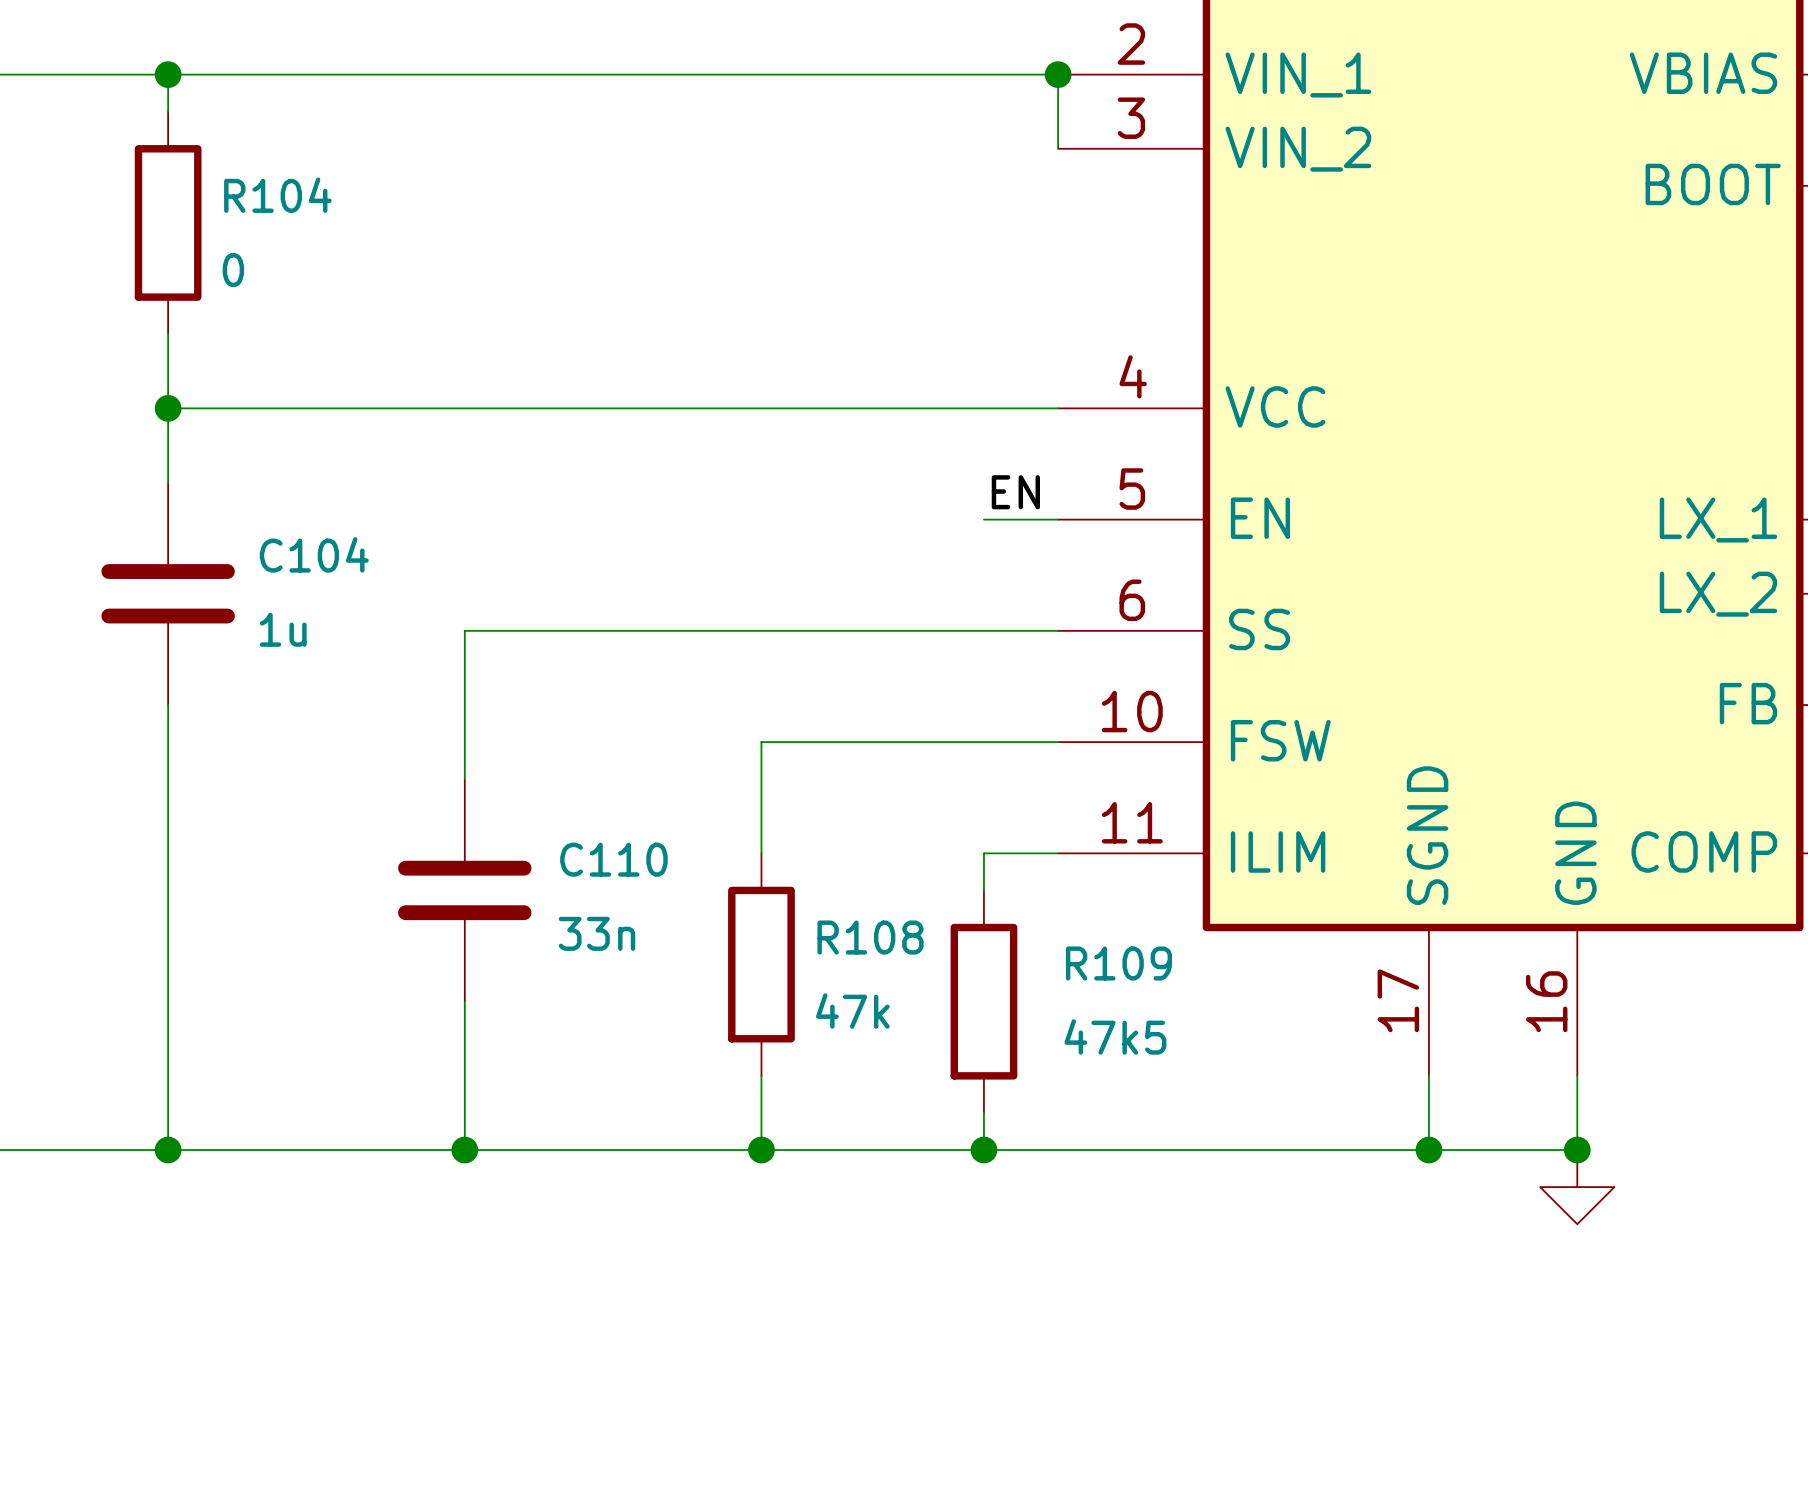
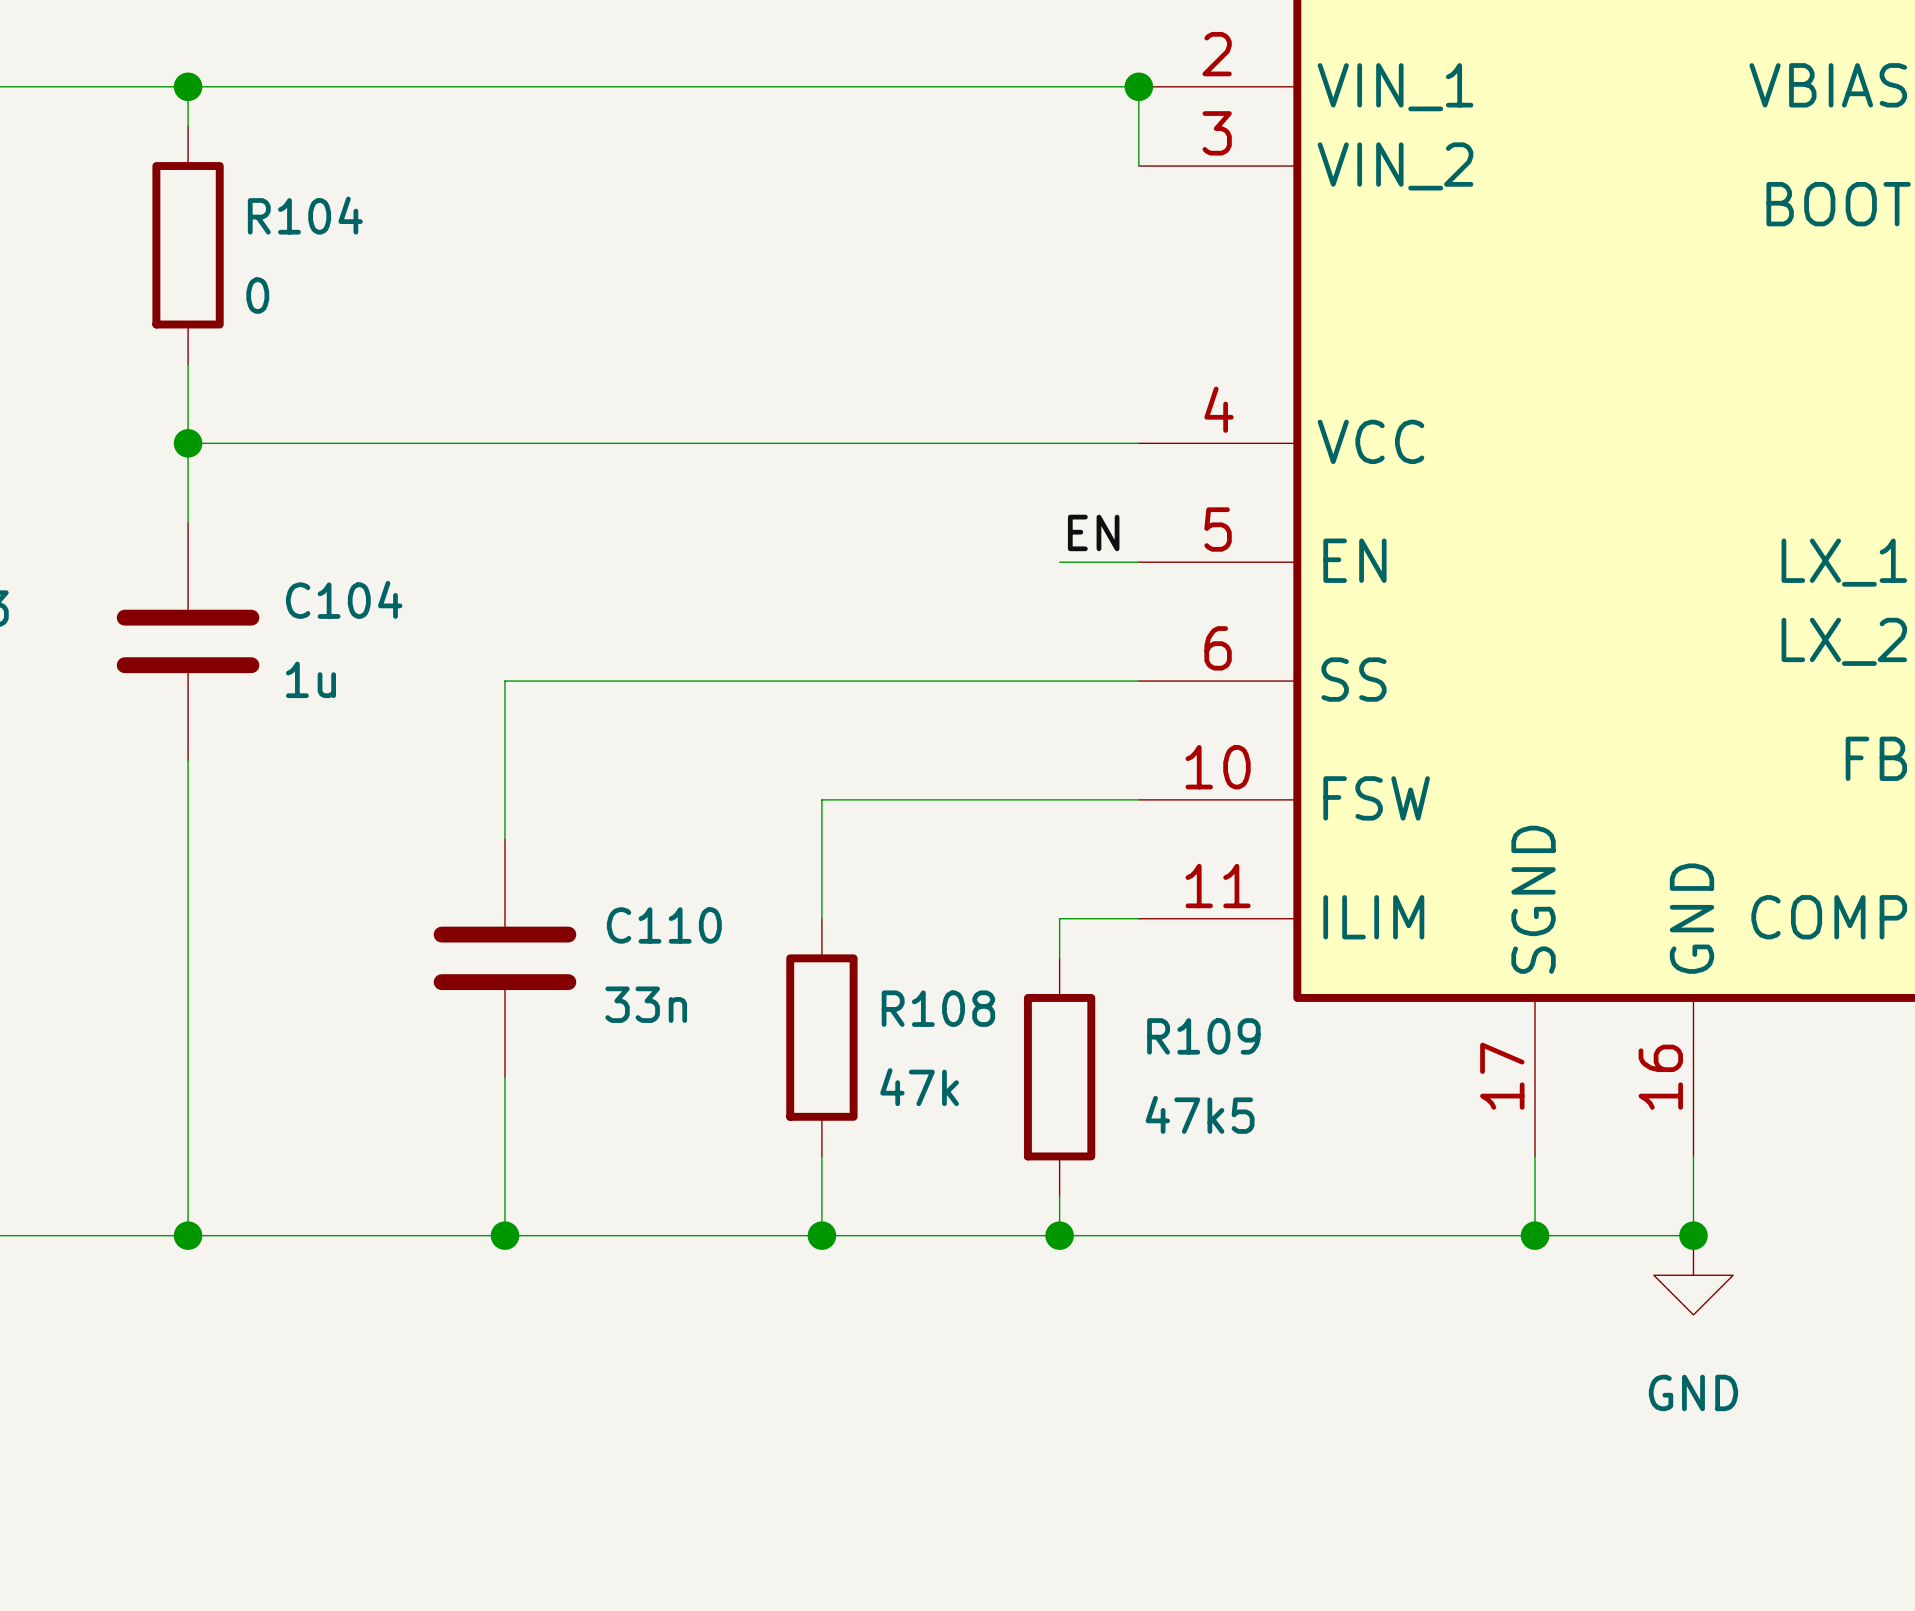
power symbol text: none -> GND (1693, 1392)

